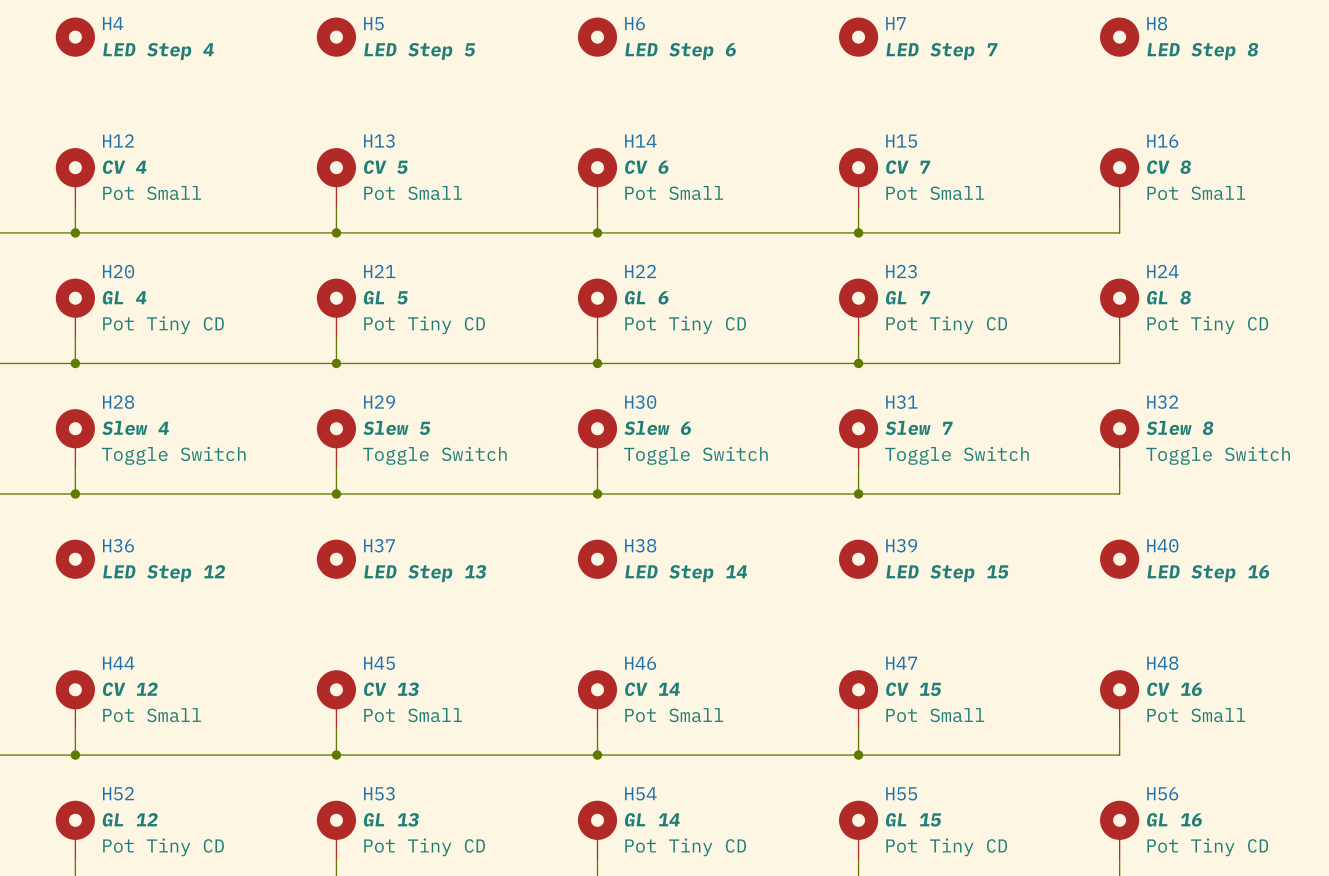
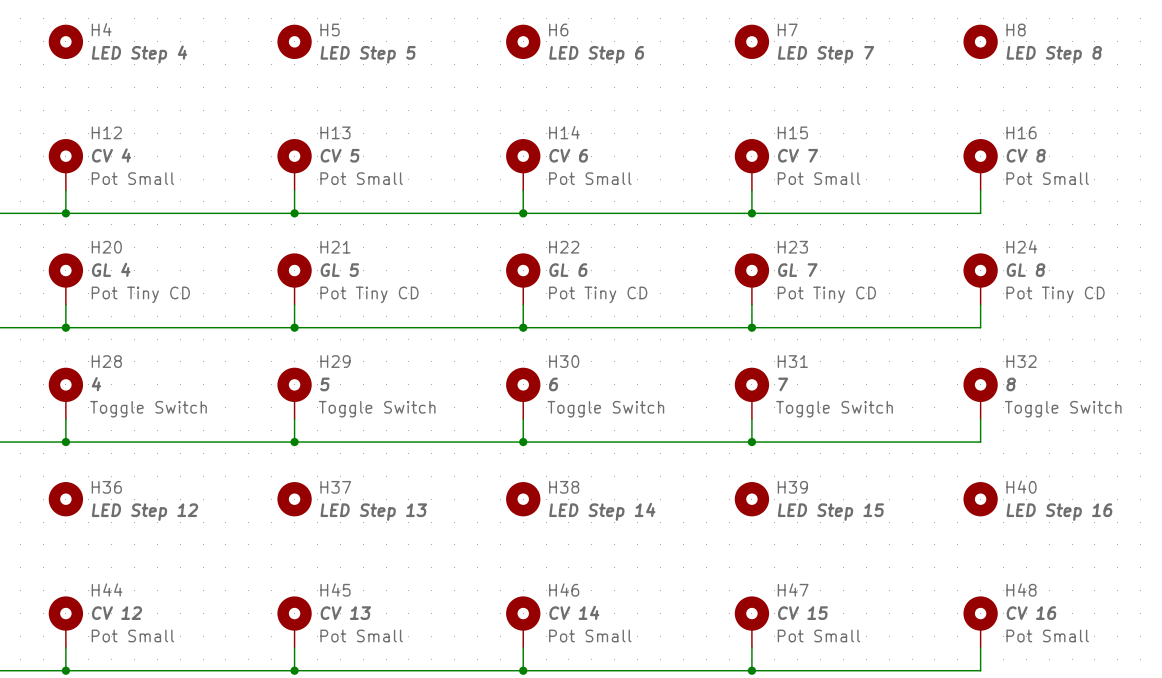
H28 value: Slew 4 (135, 427) -> 4 (96, 384)
H29 value: Slew 5 (396, 427) -> 5 (324, 384)
H30 value: Slew 6 (657, 427) -> 6 (553, 384)
H31 value: Slew 7 (919, 427) -> 7 (783, 384)
H32 value: Slew 8 (1179, 427) -> 8 (1011, 384)

